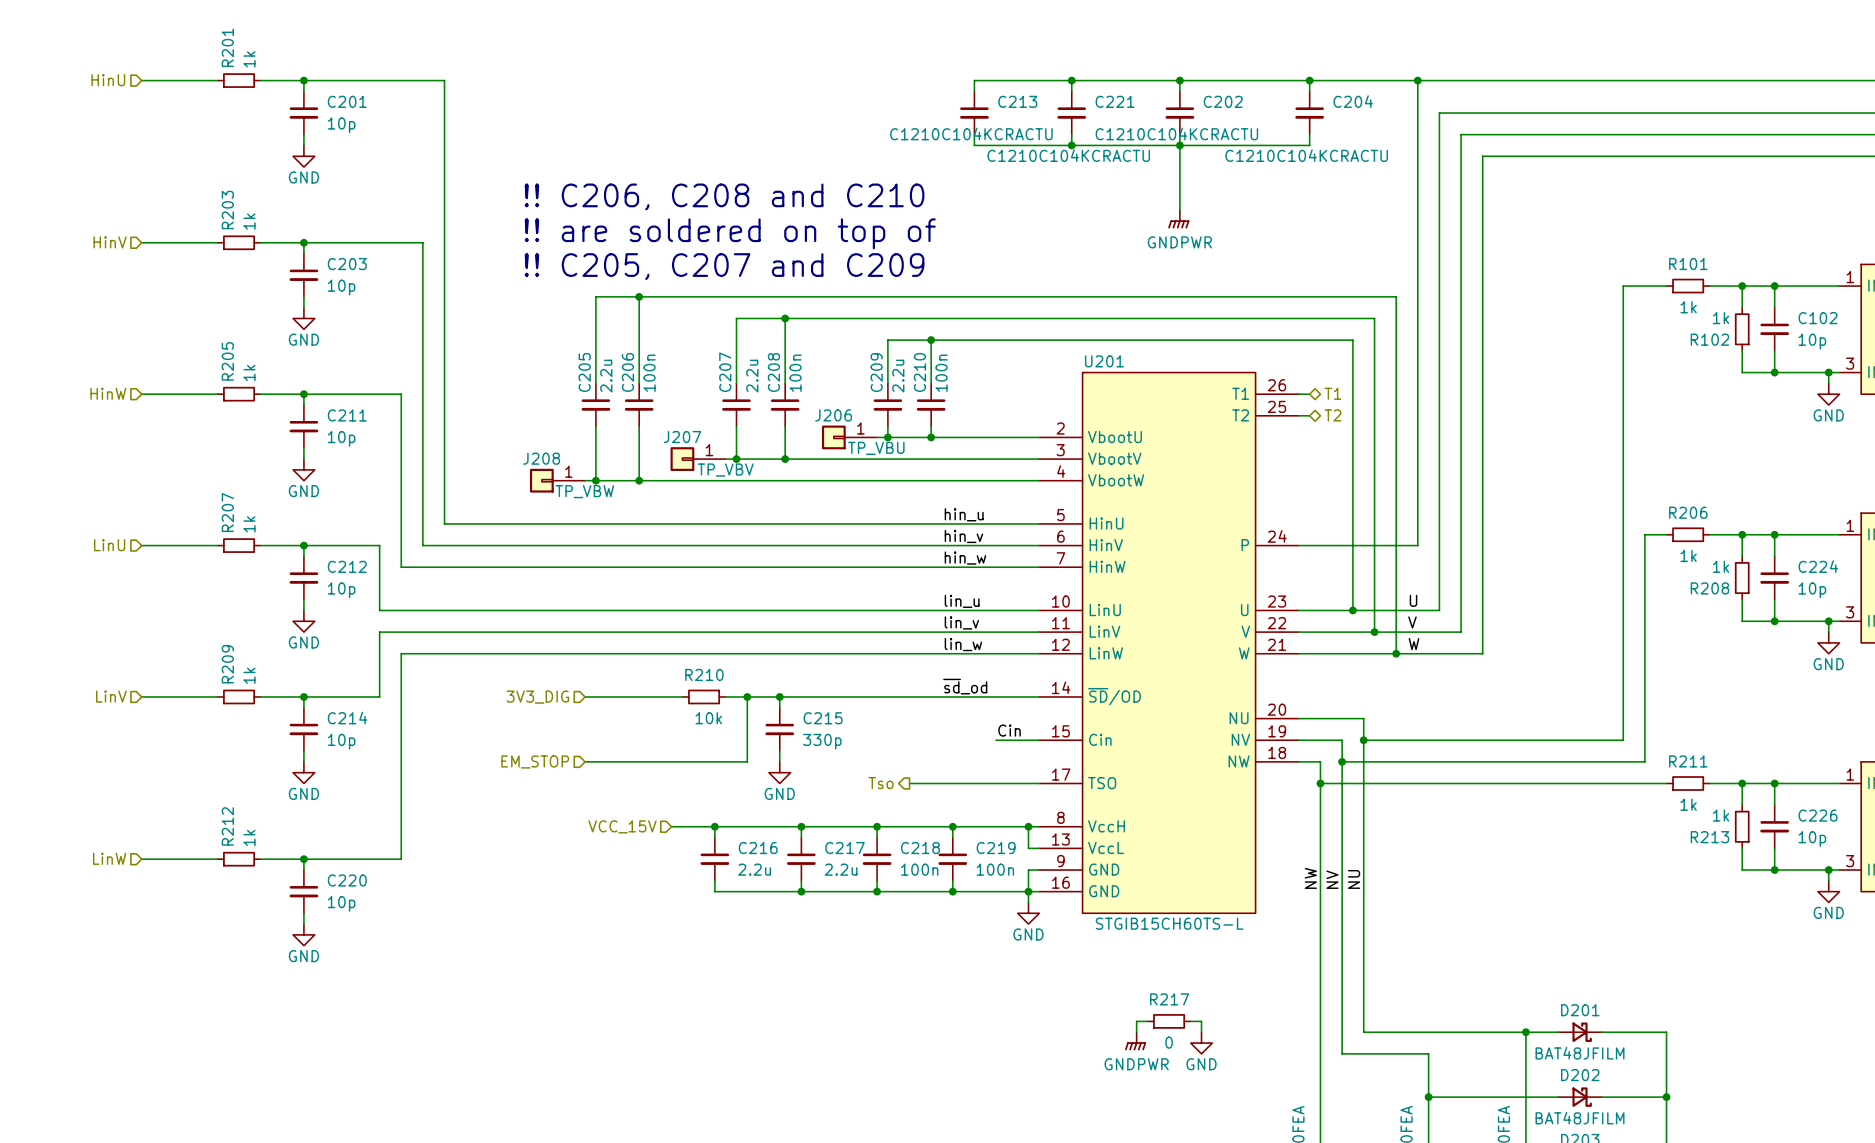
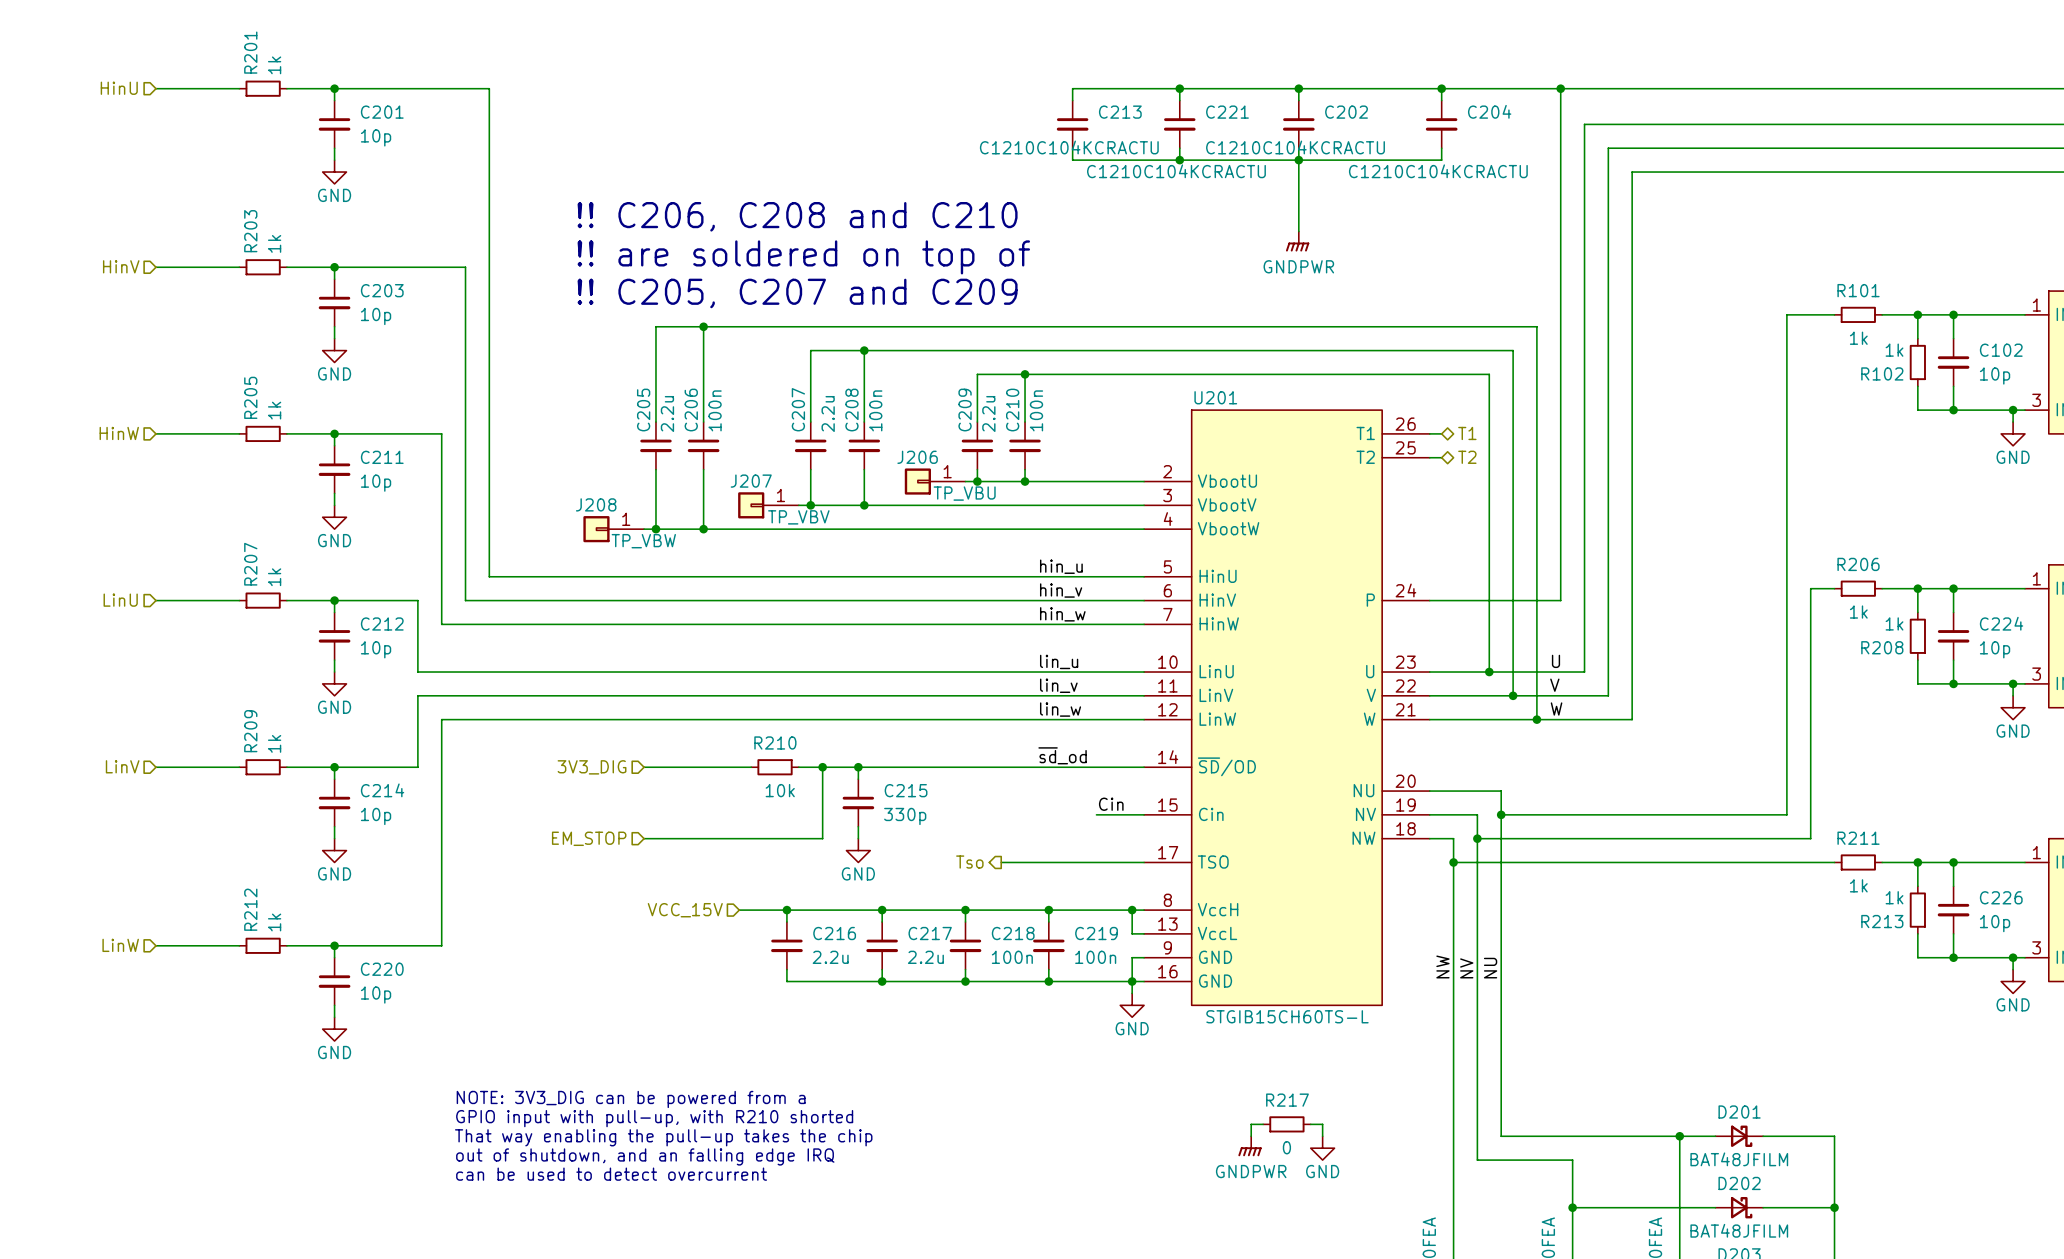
text: none -> NOTE: 3V3_DIG can be powered from a (631, 1099)
text: none -> GPIO input with pull-up, with R210 shorted (654, 1118)
text: none -> That way enabling the pull-up takes the chip (663, 1137)
text: none -> out of shutdown, and an falling edge IRQ (645, 1156)
text: none -> can be used to detect overcurrent (611, 1174)

